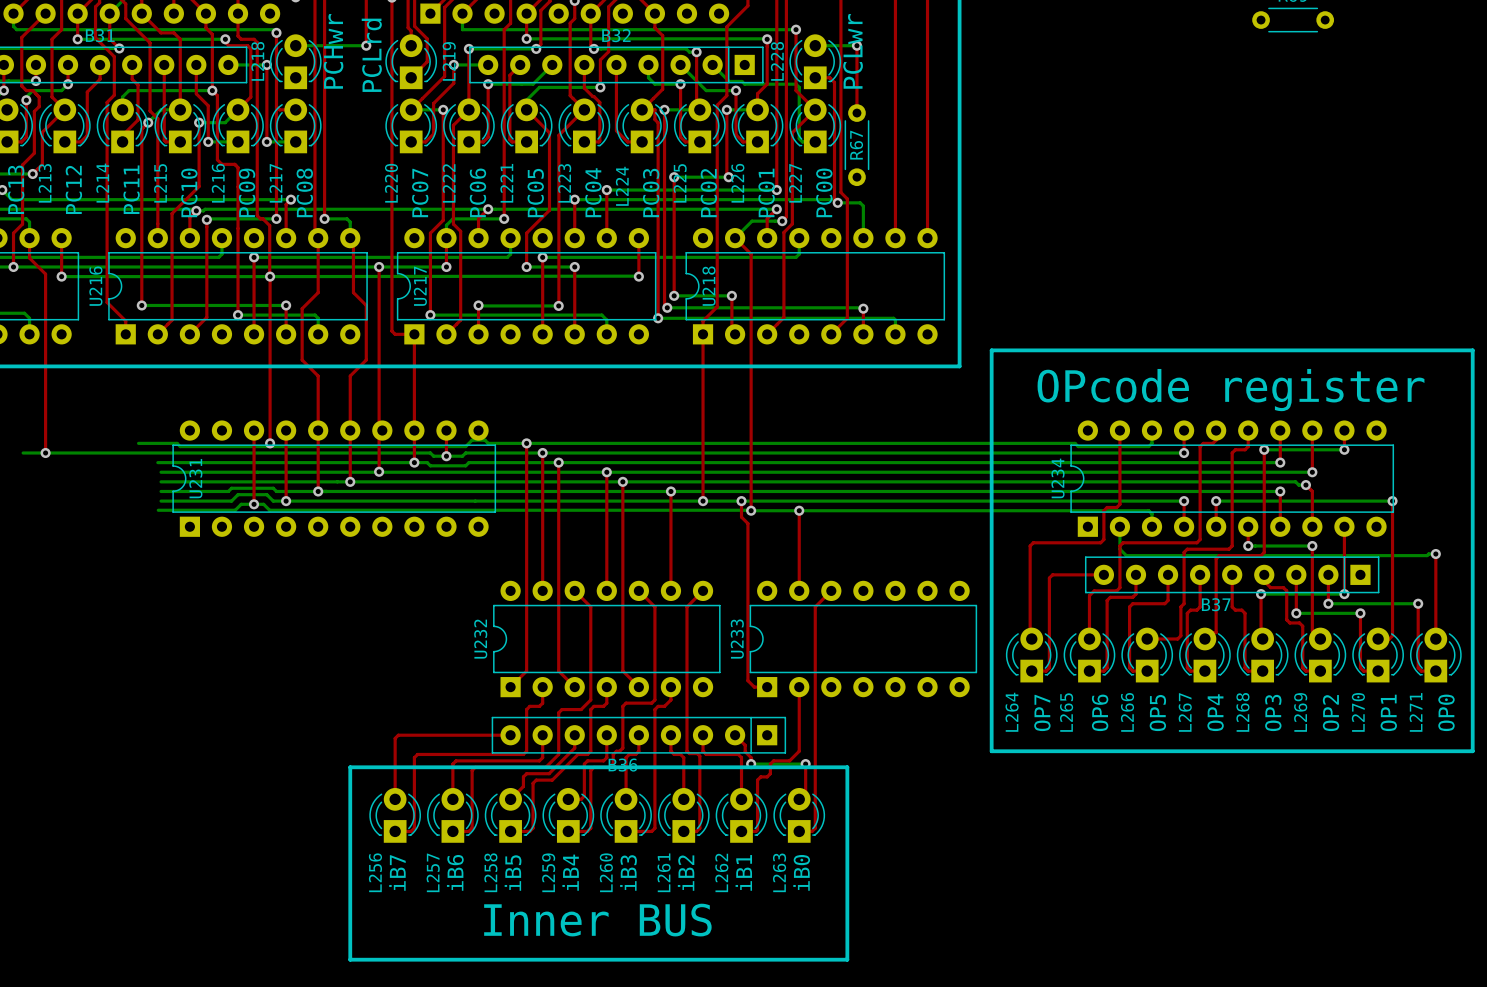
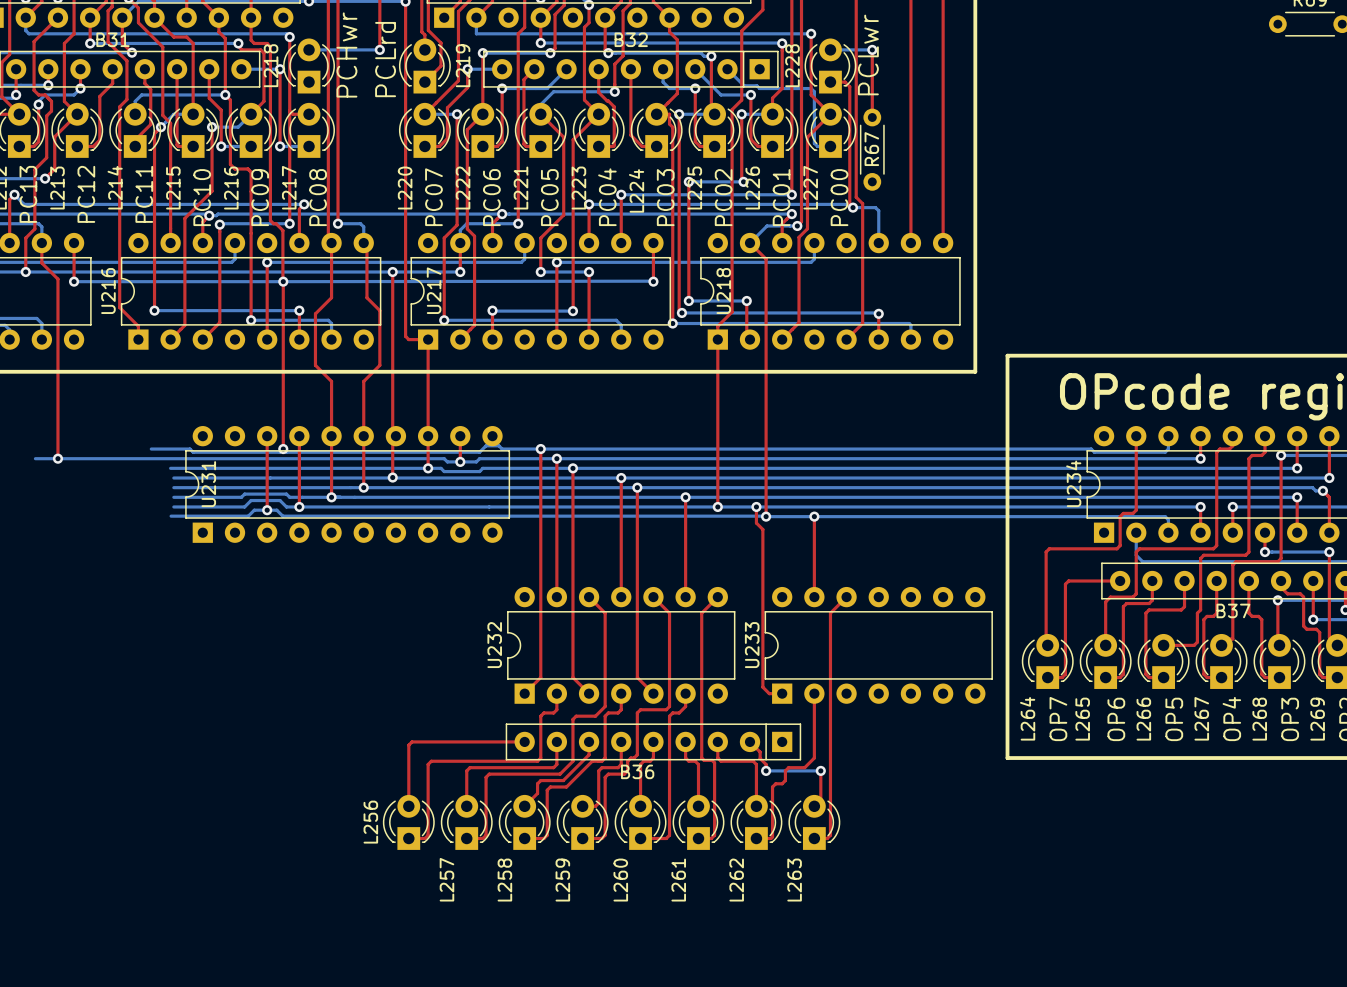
line: (350, 767) (350, 959) (847, 959) (847, 767) (350, 767) -> none
L256 name position: L256 (375, 872) -> L256 (370, 822)
text: iB7 (397, 872) -> none
text: iB6 (455, 872) -> none
text: iB4 (570, 872) -> none
text: iB3 (628, 872) -> none
text: iB1 (743, 872) -> none
text: iB0 (801, 872) -> none
text: iB5 (513, 873) -> none
text: iB2 (686, 873) -> none
text: Inner BUS (597, 920) -> none

